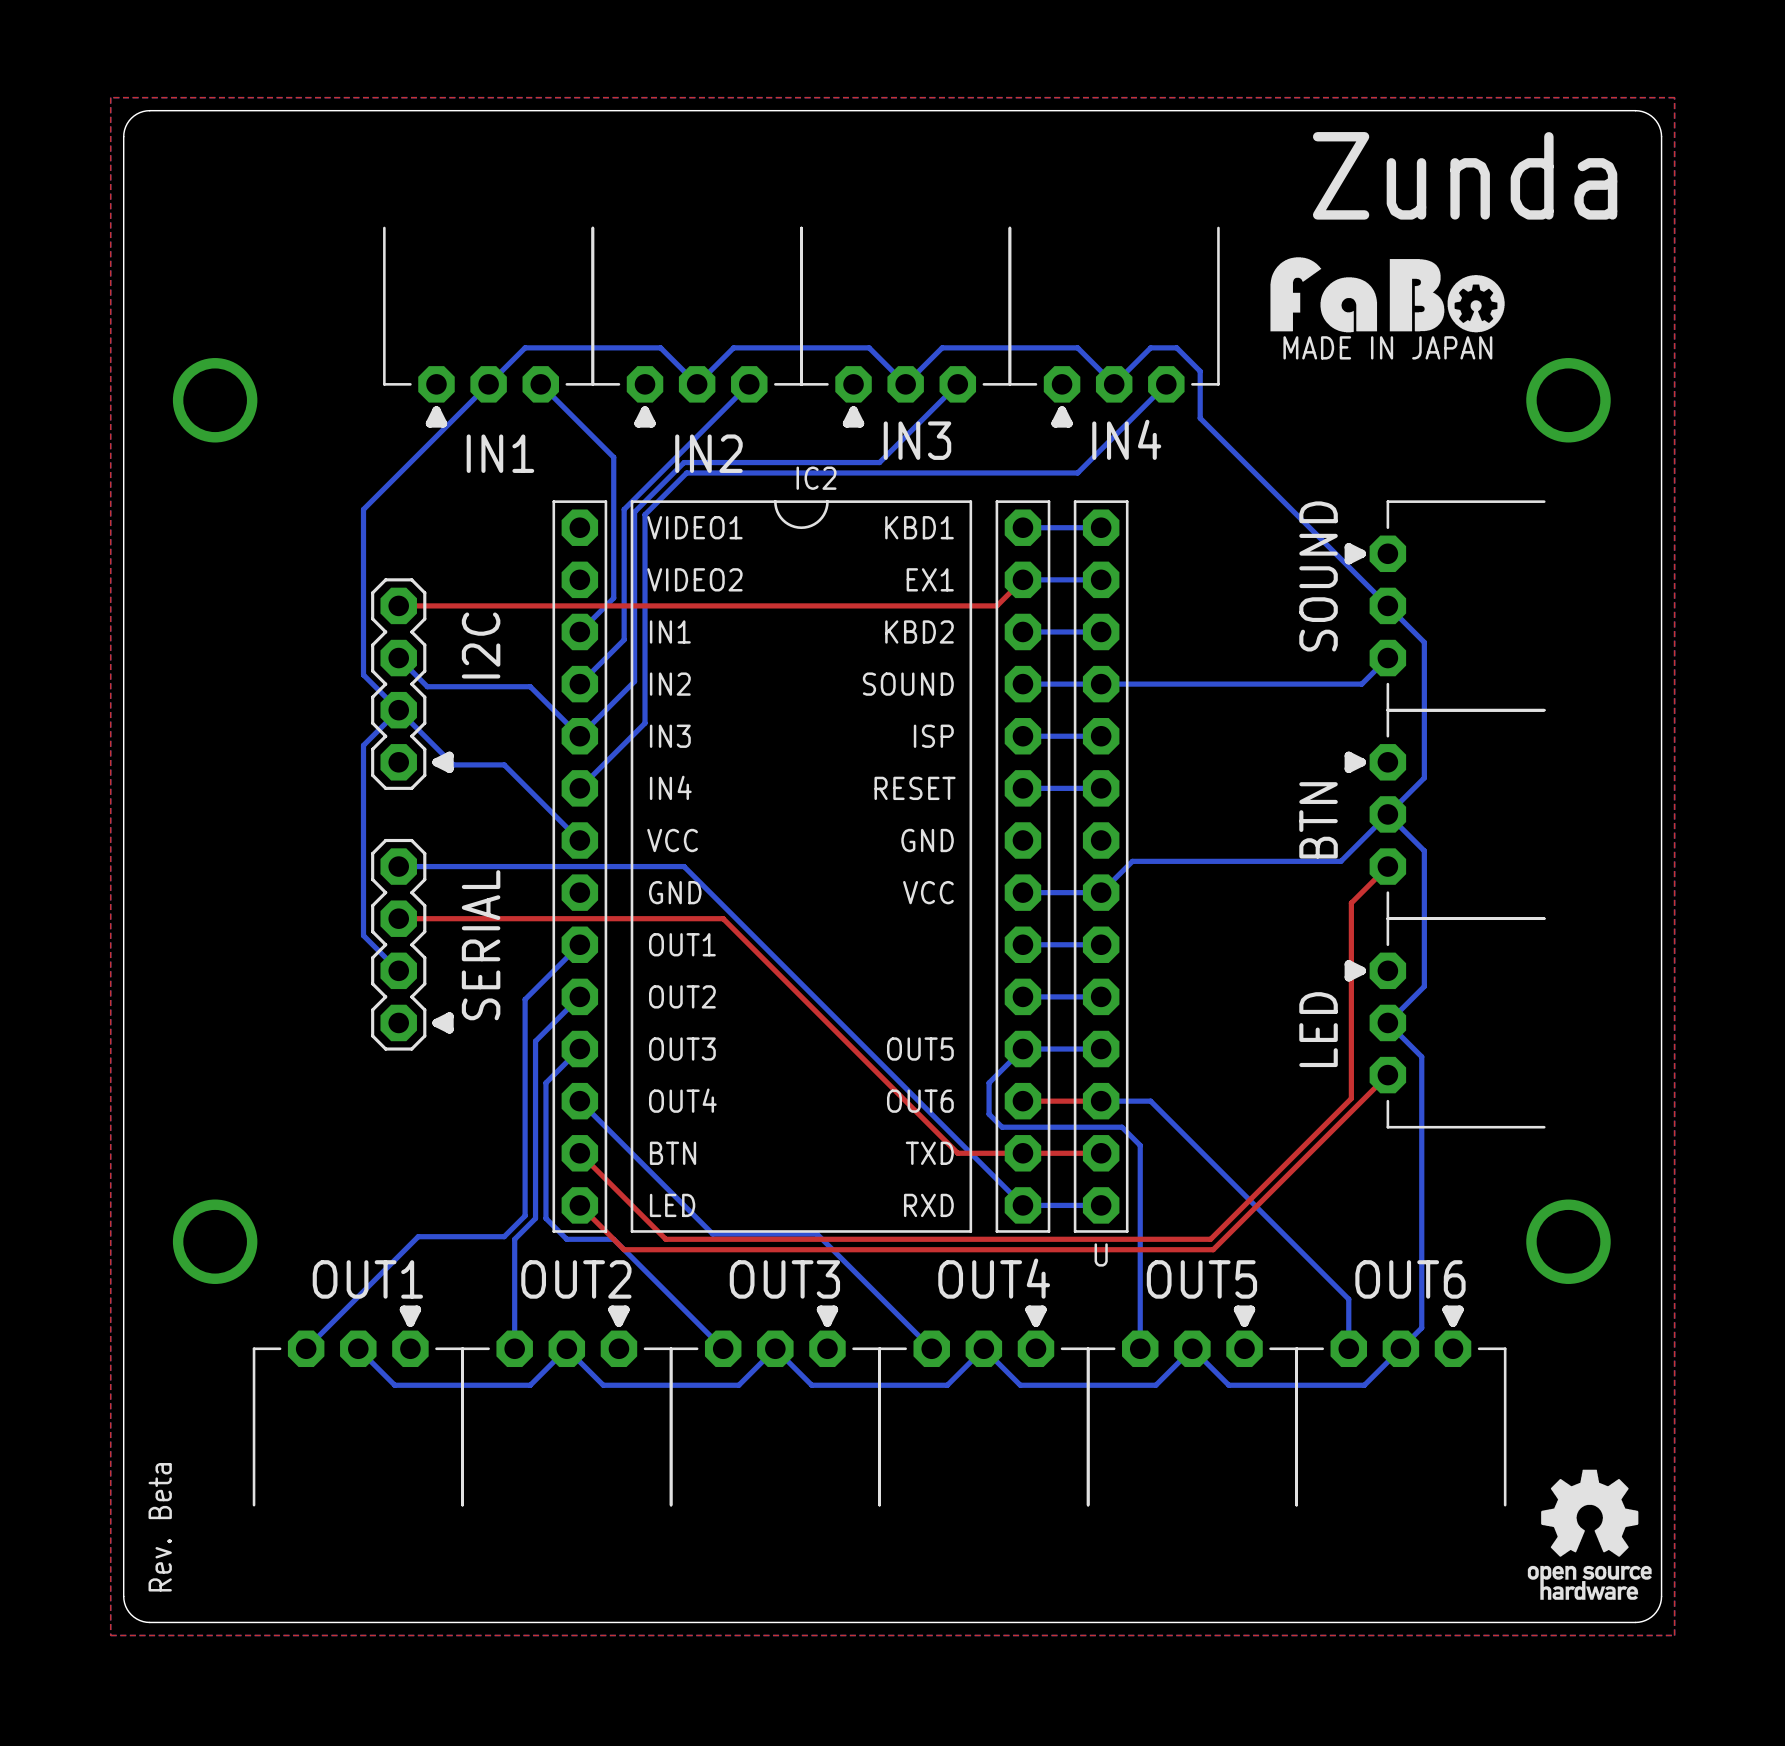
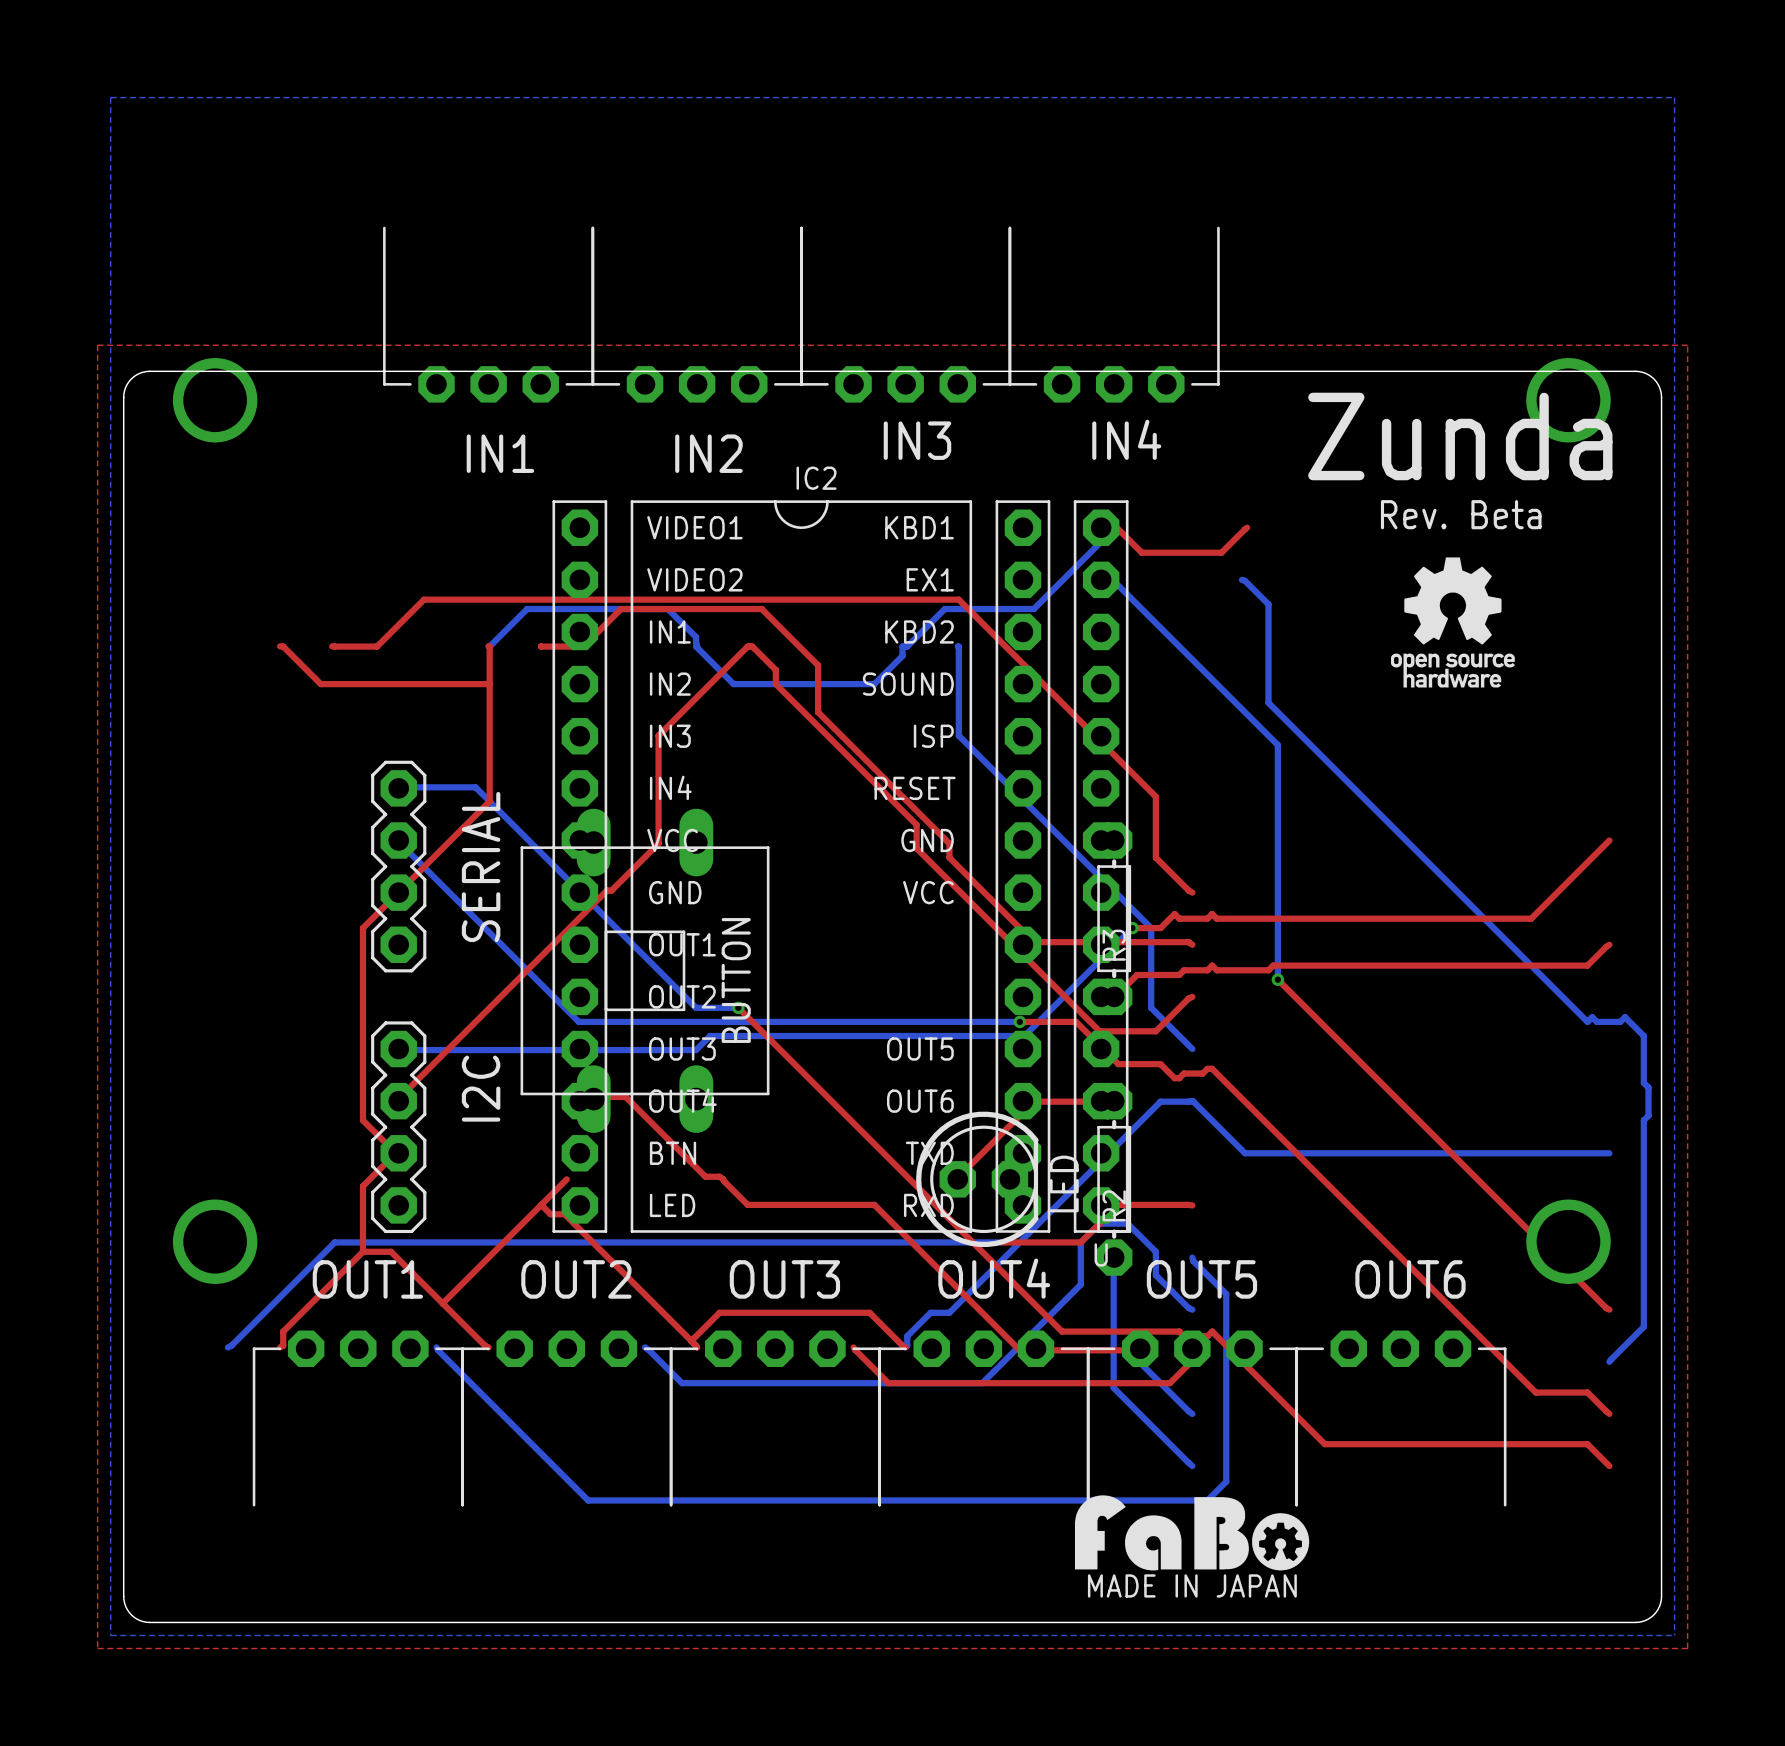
top zone outline: (110, 97) (1674, 97) (1674, 1635) (110, 1635) (110, 97) -> (97, 345) (97, 1648) (1687, 1648) (1687, 345) (97, 345)
text position: Zunda (1465, 175) -> Zunda (1460, 436)
drawing: [1270, 257, 1505, 333] -> none
text: MADE IN JAPAN (1387, 347) -> none
bottom track: (540, 384) (613, 457) (613, 598) (579, 631) -> none
bottom track: (749, 384) (624, 509) (624, 639) (579, 684) -> none
bottom track: (957, 384) (879, 462) (684, 462) (634, 512) (634, 681) (579, 736) (530, 686) (427, 686) (398, 658) -> none
bottom track: (1166, 384) (1077, 472) (686, 472) (645, 514) (645, 723) (579, 788) -> none
board edge: (123, 397) (123, 133) (127, 123) (133, 116) (149, 110) (1638, 110) (1653, 118) (1661, 133) (1661, 397) -> (123, 397) (125, 387) (131, 378) (139, 373) (149, 371) (1635, 371) (1645, 373) (1653, 378) (1659, 387) (1661, 397)
line: (436, 410) (429, 423) (443, 423) (436, 410) -> none
line: (645, 410) (638, 423) (651, 423) (645, 410) -> none
line: (853, 410) (847, 423) (860, 423) (853, 410) -> none
line: (1062, 410) (1055, 423) (1068, 423) (1062, 410) -> none
text: none -> Rev. Beta (1461, 514)
bottom track: (1022, 527) (1101, 527) -> none
bottom track: none -> (1116, 527) (1033, 609) (944, 609) (907, 646) (902, 646) (902, 655) (874, 684) (733, 684) (696, 646) (696, 637) (667, 609) (527, 609) (488, 646)
top track: none -> (1116, 527) (1141, 552) (1221, 552) (1247, 527)
line: (1348, 547) (1348, 560) (1361, 553) (1348, 547) -> none
drawing: none -> [1391, 557, 1515, 688]
bottom track: (1022, 579) (1101, 579) -> none
top track: (1022, 579) (996, 605) (398, 605) -> none
bottom track: none -> (1111, 579) (1277, 745) (1277, 979)
bottom track: none -> (1241, 579) (1268, 604) (1268, 702) (1587, 1021) (1592, 1017) (1596, 1021) (1620, 1021) (1625, 1017) (1643, 1035) (1643, 1082) (1648, 1087) (1648, 1115) (1643, 1120) (1643, 1326) (1609, 1361)
SOUND: (1457, 605) -> none
bottom track: (1022, 631) (1101, 631) -> none
top track: none -> (280, 646) (283, 646) (320, 684) (489, 684)
top track: none -> (332, 646) (377, 646) (423, 599) (958, 599) (1155, 796) (1155, 857) (1192, 892)
top track: none -> (488, 646) (489, 801) (362, 928) (362, 1120) (395, 1153)
top track: none -> (540, 646) (583, 646) (621, 609) (761, 609) (818, 665) (818, 712) (949, 843) (949, 857) (1033, 942) (1188, 942) (1192, 944)
bottom track: none -> (957, 646) (958, 735) (1151, 928) (1151, 1007) (1192, 1049)
bottom track: (1387, 658) (1361, 684) (1022, 684) -> none
I2C position: (398, 684) -> (398, 1127)
bottom track: (398, 710) (363, 745) (363, 935) (398, 970) -> none
bottom track: (1022, 736) (1101, 736) -> none
line: (449, 755) (436, 762) (449, 768) (449, 755) -> none
line: (1348, 755) (1348, 768) (1361, 762) (1348, 755) -> none
bottom track: none -> (398, 788) (475, 787) (696, 1007) (738, 1007)
bottom track: (1022, 788) (1101, 788) -> none
bottom track: (1387, 814) (1424, 850) (1424, 986) (1387, 1022) (1421, 1056) (1421, 1327) (1364, 1385) (1228, 1385) (1192, 1348) (1155, 1385) (1020, 1385) (983, 1348) (947, 1385) (811, 1385) (775, 1348) (738, 1385) (603, 1385) (566, 1348) (530, 1385) (394, 1385) (358, 1348) -> none
BTN: (1457, 814) -> none
bottom track: none -> (398, 840) (578, 1021) (1019, 1021)
bottom track: (579, 840) (504, 764) (453, 764) (363, 674) (363, 509) (525, 347) (660, 347) (697, 384) (733, 347) (869, 347) (905, 384) (942, 347) (1077, 347) (1114, 384) (1150, 347) (1176, 347) (1200, 371) (1200, 418) (1424, 642) (1424, 777) (1340, 861) (1132, 861) (1101, 892) (1022, 892) -> none
top track: none -> (1609, 840) (1531, 918) (1216, 918) (1212, 914) (1207, 918) (1179, 918) (1174, 914) (1160, 928) (1132, 928)
bottom track: (398, 866) (684, 866) (1022, 1205) (1101, 1205) -> none
top track: (1387, 866) (1351, 903) (1351, 1098) (1210, 1239) (665, 1239) (579, 1153) -> none
top track: (398, 918) (723, 918) (957, 1153) (1101, 1153) -> none
R3: none -> (1114, 918)
bottom track: none -> (1132, 928) (1024, 1035) (710, 1035) (696, 1050) (398, 1049)
via: none -> (1132, 928)
SERIAL position: (398, 944) -> (398, 866)
bottom track: (579, 944) (525, 999) (525, 1215) (504, 1236) (418, 1236) (306, 1348) -> none
bottom track: (1022, 944) (1101, 944) -> none
top track: none -> (1609, 944) (1587, 965) (1273, 965) (1268, 970) (1216, 970) (1212, 965) (1207, 970) (1184, 970) (1179, 975) (1137, 975) (1114, 996)
line: (1348, 964) (1361, 970) (1348, 977) (1348, 964) -> none
BUTTON: none -> (645, 970)
top track: none -> (1277, 979) (1609, 1309)
via: none -> (1277, 979)
bottom track: (579, 996) (535, 1041) (535, 1218) (514, 1239) (514, 1348) -> none
bottom track: (1022, 996) (1101, 996) -> none
top track: none -> (1192, 996) (1155, 1031) (1099, 1031) (916, 848) (916, 824) (775, 684) (775, 670) (752, 646) (749, 646) (658, 735) (658, 843) (611, 890) (606, 890) (400, 1096) (398, 1101)
top track: none -> (738, 1007) (1062, 1331) (1179, 1331) (1184, 1336) (1207, 1336) (1212, 1331) (1324, 1444) (1587, 1444) (1609, 1466)
via: none -> (738, 1007)
line: (449, 1016) (449, 1029) (436, 1022) (449, 1016) -> none
top track: none -> (1019, 1021) (1076, 1021) (1118, 1064) (1160, 1064) (1174, 1078) (1179, 1078) (1184, 1073) (1202, 1073) (1207, 1068) (1212, 1068) (1535, 1392) (1587, 1392) (1609, 1413)
via: none -> (1019, 1021)
LED: (1457, 1022) -> none
bottom track: (579, 1049) (545, 1082) (545, 1218) (566, 1239) (613, 1239) (723, 1348) -> none
bottom track: (1101, 1049) (1022, 1049) (989, 1082) (989, 1114) (1002, 1127) (1122, 1127) (1140, 1145) (1140, 1348) -> none
top track: (1387, 1075) (1213, 1249) (624, 1249) (579, 1205) -> none
top track: none -> (593, 1099) (597, 1096) (625, 1096) (705, 1176) (719, 1176) (747, 1204) (874, 1204) (1019, 1350) (1127, 1350)
bottom track: (579, 1101) (712, 1234) (817, 1234) (931, 1348) -> none
top track: (1022, 1101) (1101, 1101) -> none
bottom track: (1101, 1101) (1150, 1101) (1348, 1299) (1348, 1348) -> none
top track: none -> (1114, 1101) (1033, 1101) (957, 1179)
top track: none -> (395, 1153) (362, 1186) (362, 1251)
bottom track: none -> (1609, 1153) (1245, 1153) (1193, 1101) (1160, 1101) (949, 1312) (930, 1312) (907, 1336) (905, 1347)
top track: none -> (566, 1179) (442, 1303)
LED: none -> (977, 1179)
R2: none -> (1114, 1179)
top track: none -> (541, 1204) (550, 1214) (564, 1214) (697, 1347) (691, 1340) (719, 1312) (869, 1312) (905, 1347)
top track: none -> (1192, 1205) (1118, 1204) (1080, 1242) (1001, 1242)
bottom track: none -> (1001, 1242) (334, 1242) (227, 1347)
top track: none -> (362, 1251) (283, 1331) (283, 1345) (280, 1347)
top track: none -> (362, 1251) (391, 1251) (488, 1347)
bottom track: none -> (1114, 1257) (1113, 1387) (1192, 1466)
bottom track: none -> (1192, 1257) (1193, 1261) (1226, 1294) (1226, 1481) (1207, 1500) (588, 1500) (436, 1347)
line: (403, 1309) (410, 1322) (416, 1309) (403, 1309) -> none
line: (612, 1309) (625, 1309) (618, 1322) (612, 1309) -> none
line: (820, 1309) (833, 1309) (827, 1322) (820, 1309) -> none
line: (1029, 1309) (1042, 1309) (1035, 1322) (1029, 1309) -> none
bottom track: none -> (1192, 1309) (1155, 1275) (1155, 1251) (1127, 1223) (1099, 1223) (1080, 1242) (1080, 1284) (982, 1383) (682, 1383) (645, 1347)
line: (1237, 1309) (1251, 1309) (1244, 1322) (1237, 1309) -> none
line: (1446, 1309) (1459, 1309) (1453, 1322) (1446, 1309) -> none
top track: none -> (853, 1347) (888, 1383) (1169, 1383) (1192, 1361)
bottom track: none -> (1127, 1350) (1192, 1413)
drawing: [1527, 1469, 1652, 1600] -> none
drawing: none -> [1074, 1495, 1310, 1571]
text: Rev. Beta (160, 1527) -> none
text: none -> MADE IN JAPAN (1192, 1585)

